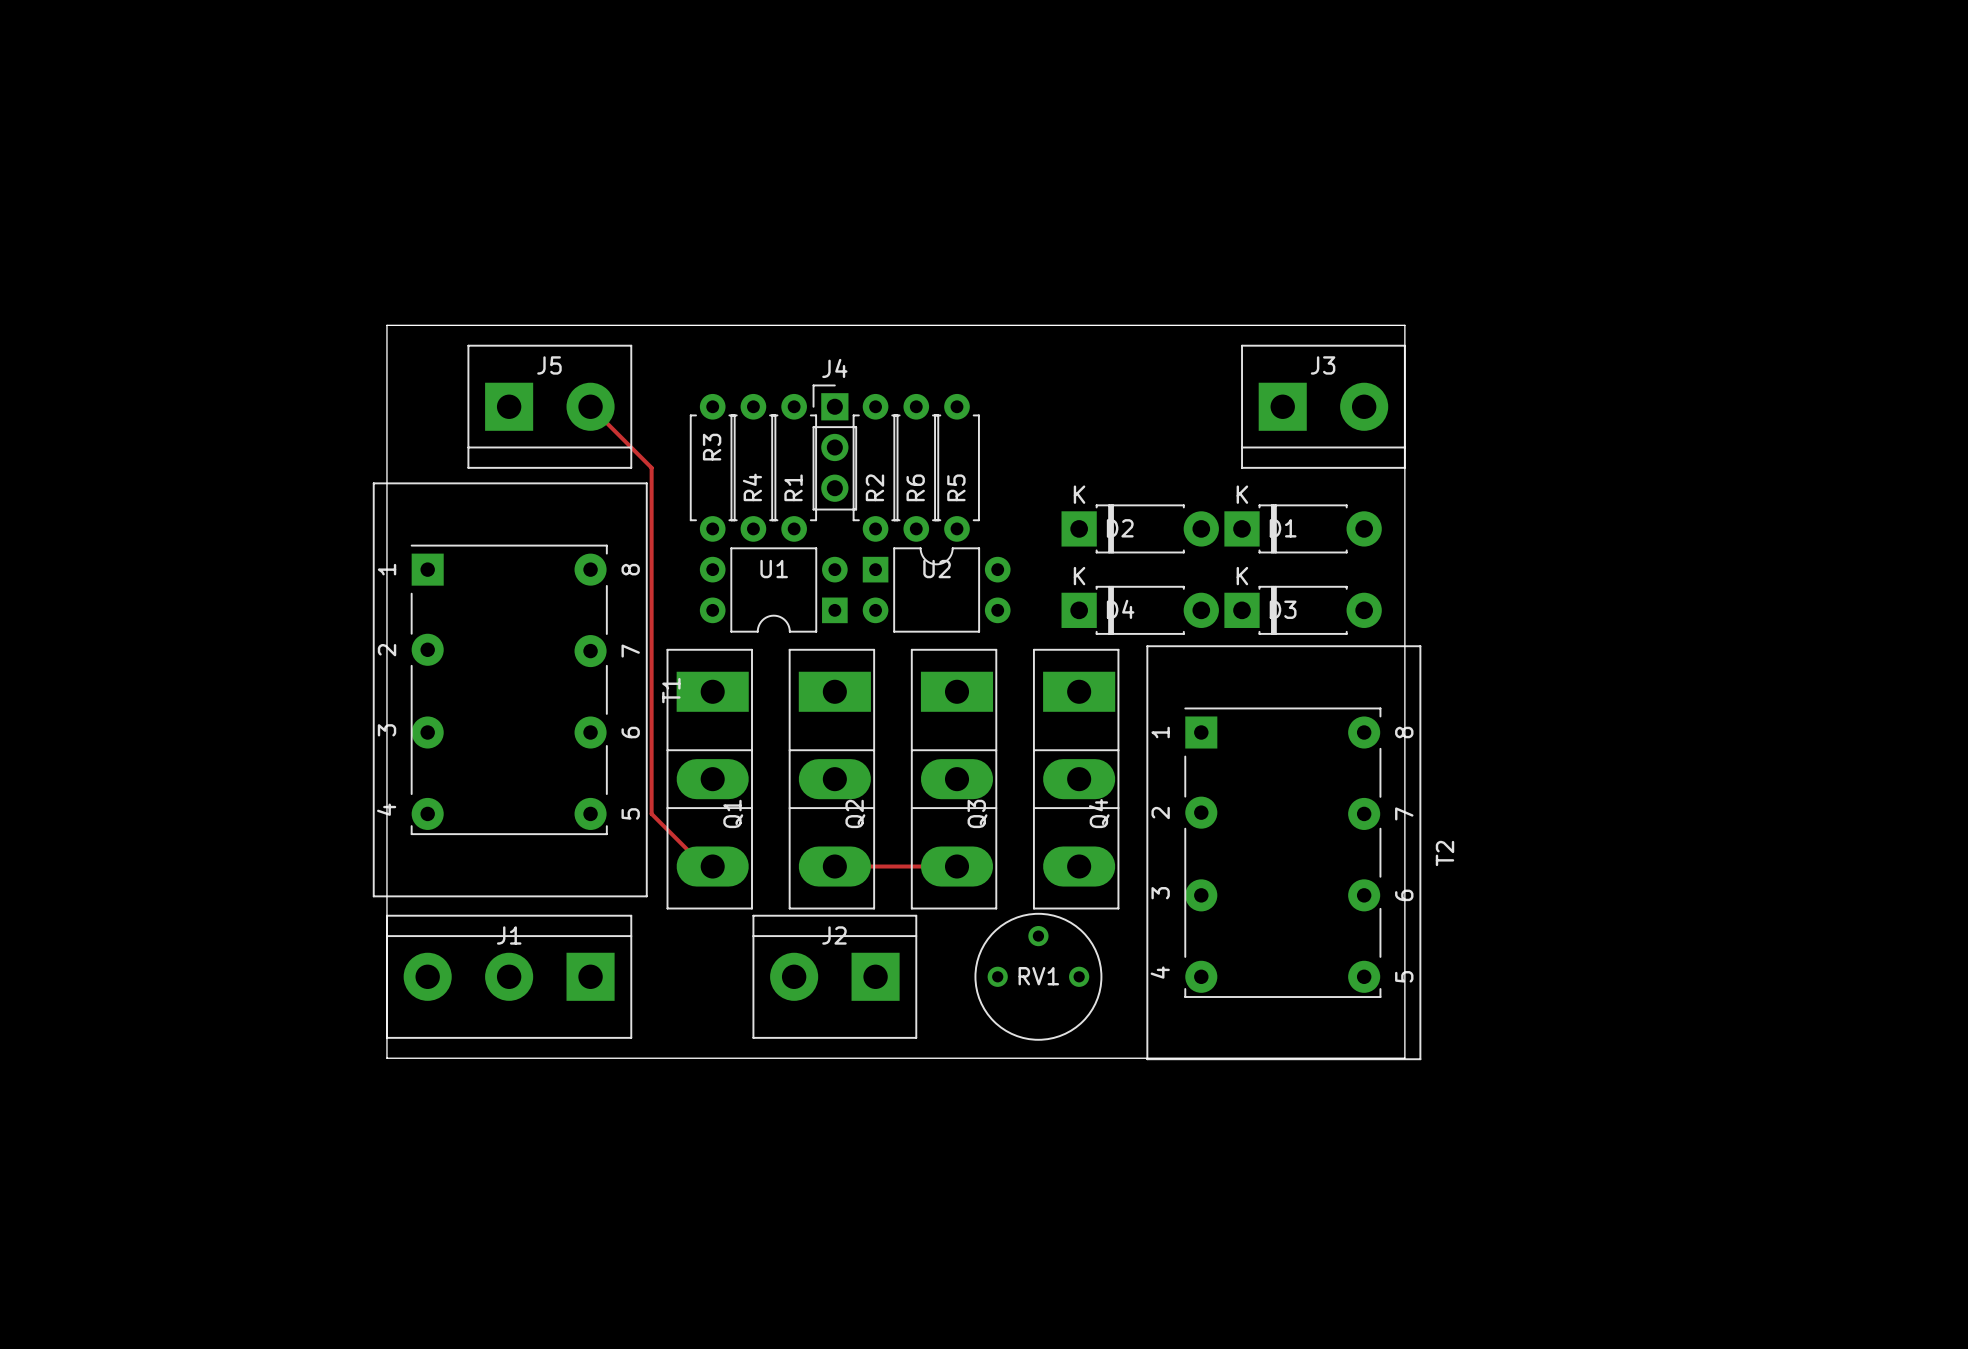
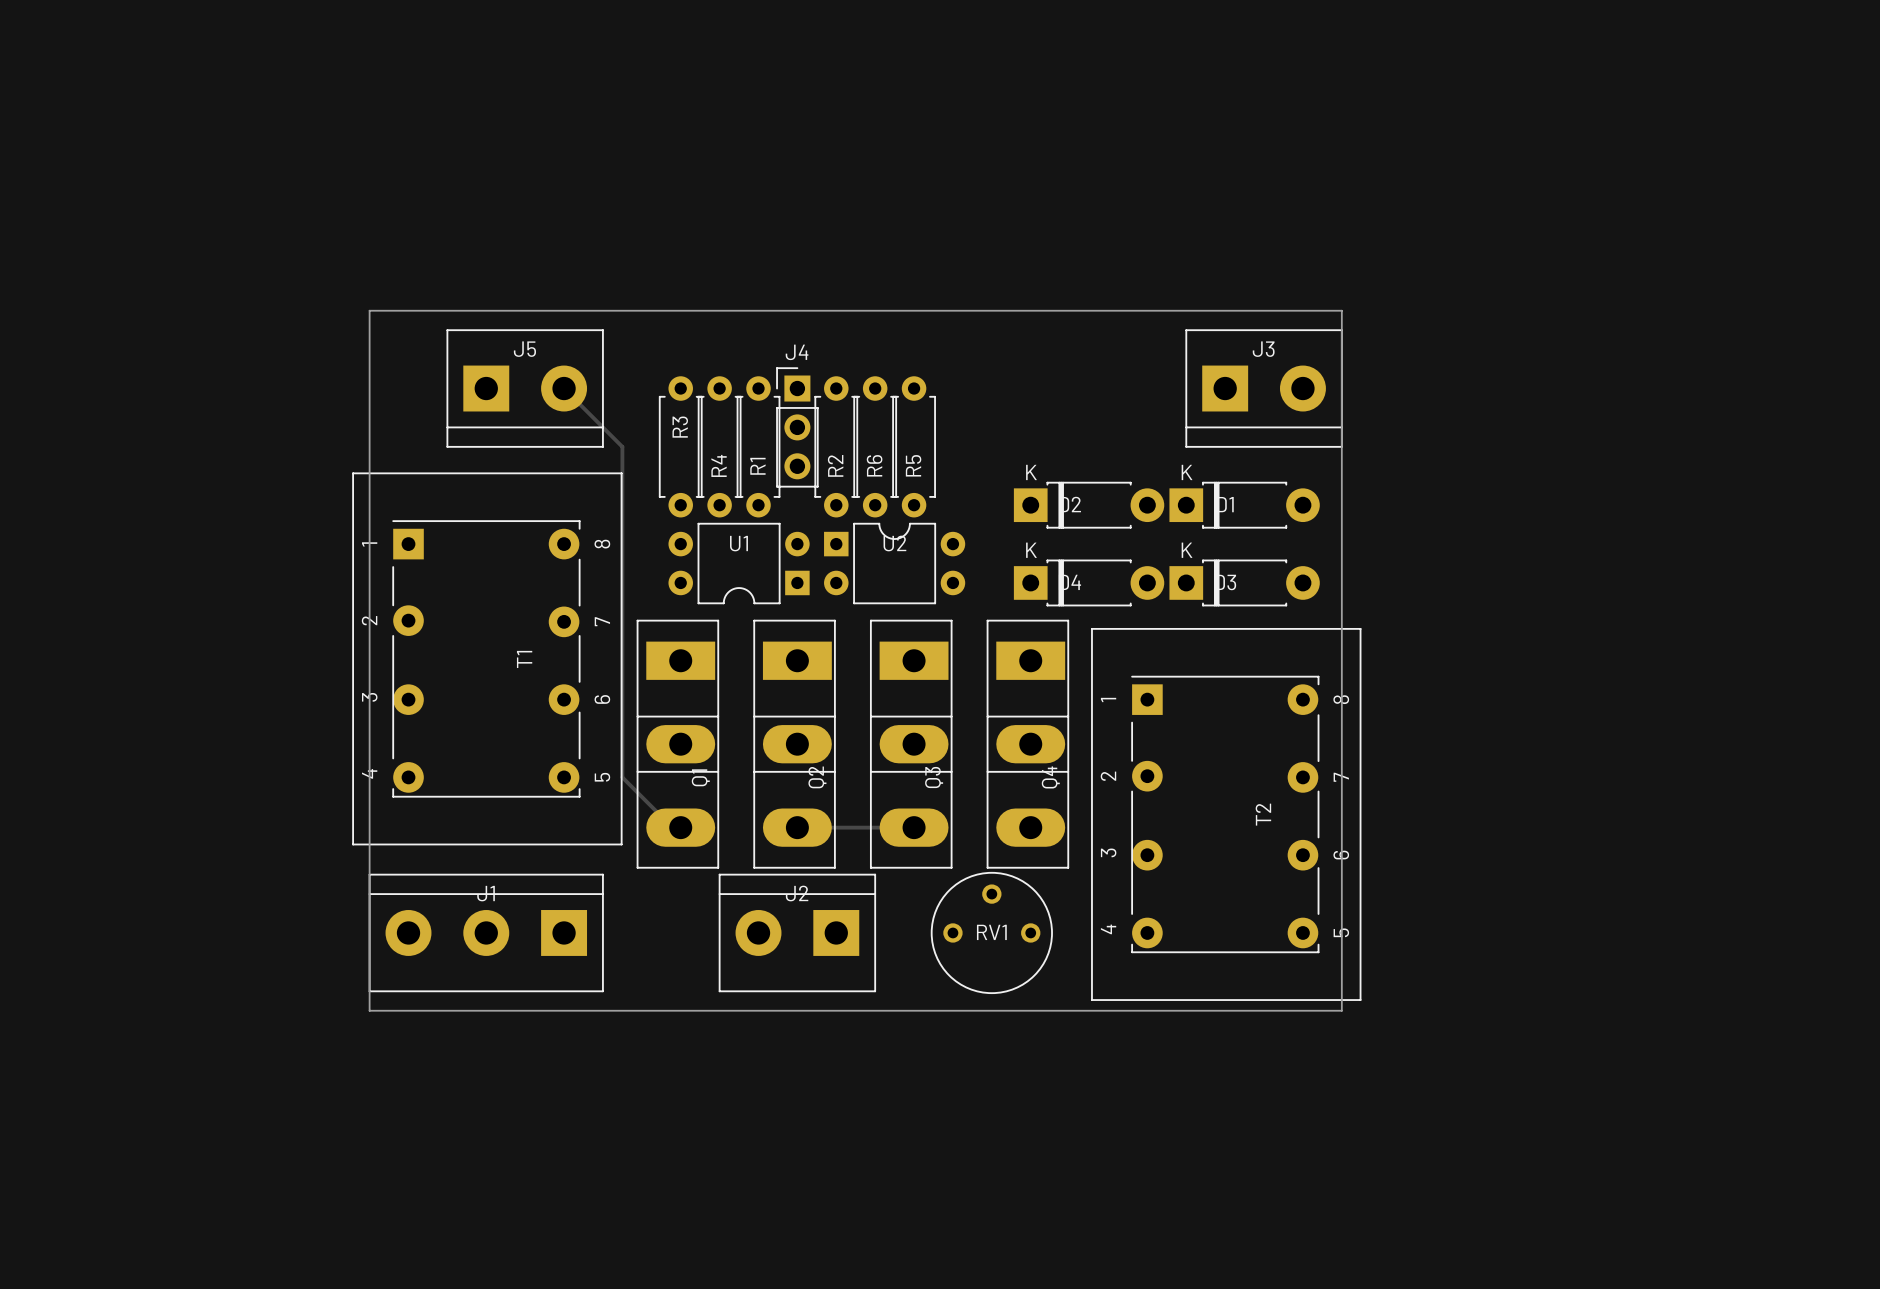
T1 footprint: [372, 482, 648, 898] -> [352, 472, 623, 846]
T2 footprint: [1146, 645, 1422, 1061] -> [1091, 627, 1362, 1001]
T1 name position: T1 (671, 690) -> T1 (524, 659)
T2 name position: T2 (1445, 853) -> T2 (1263, 814)

